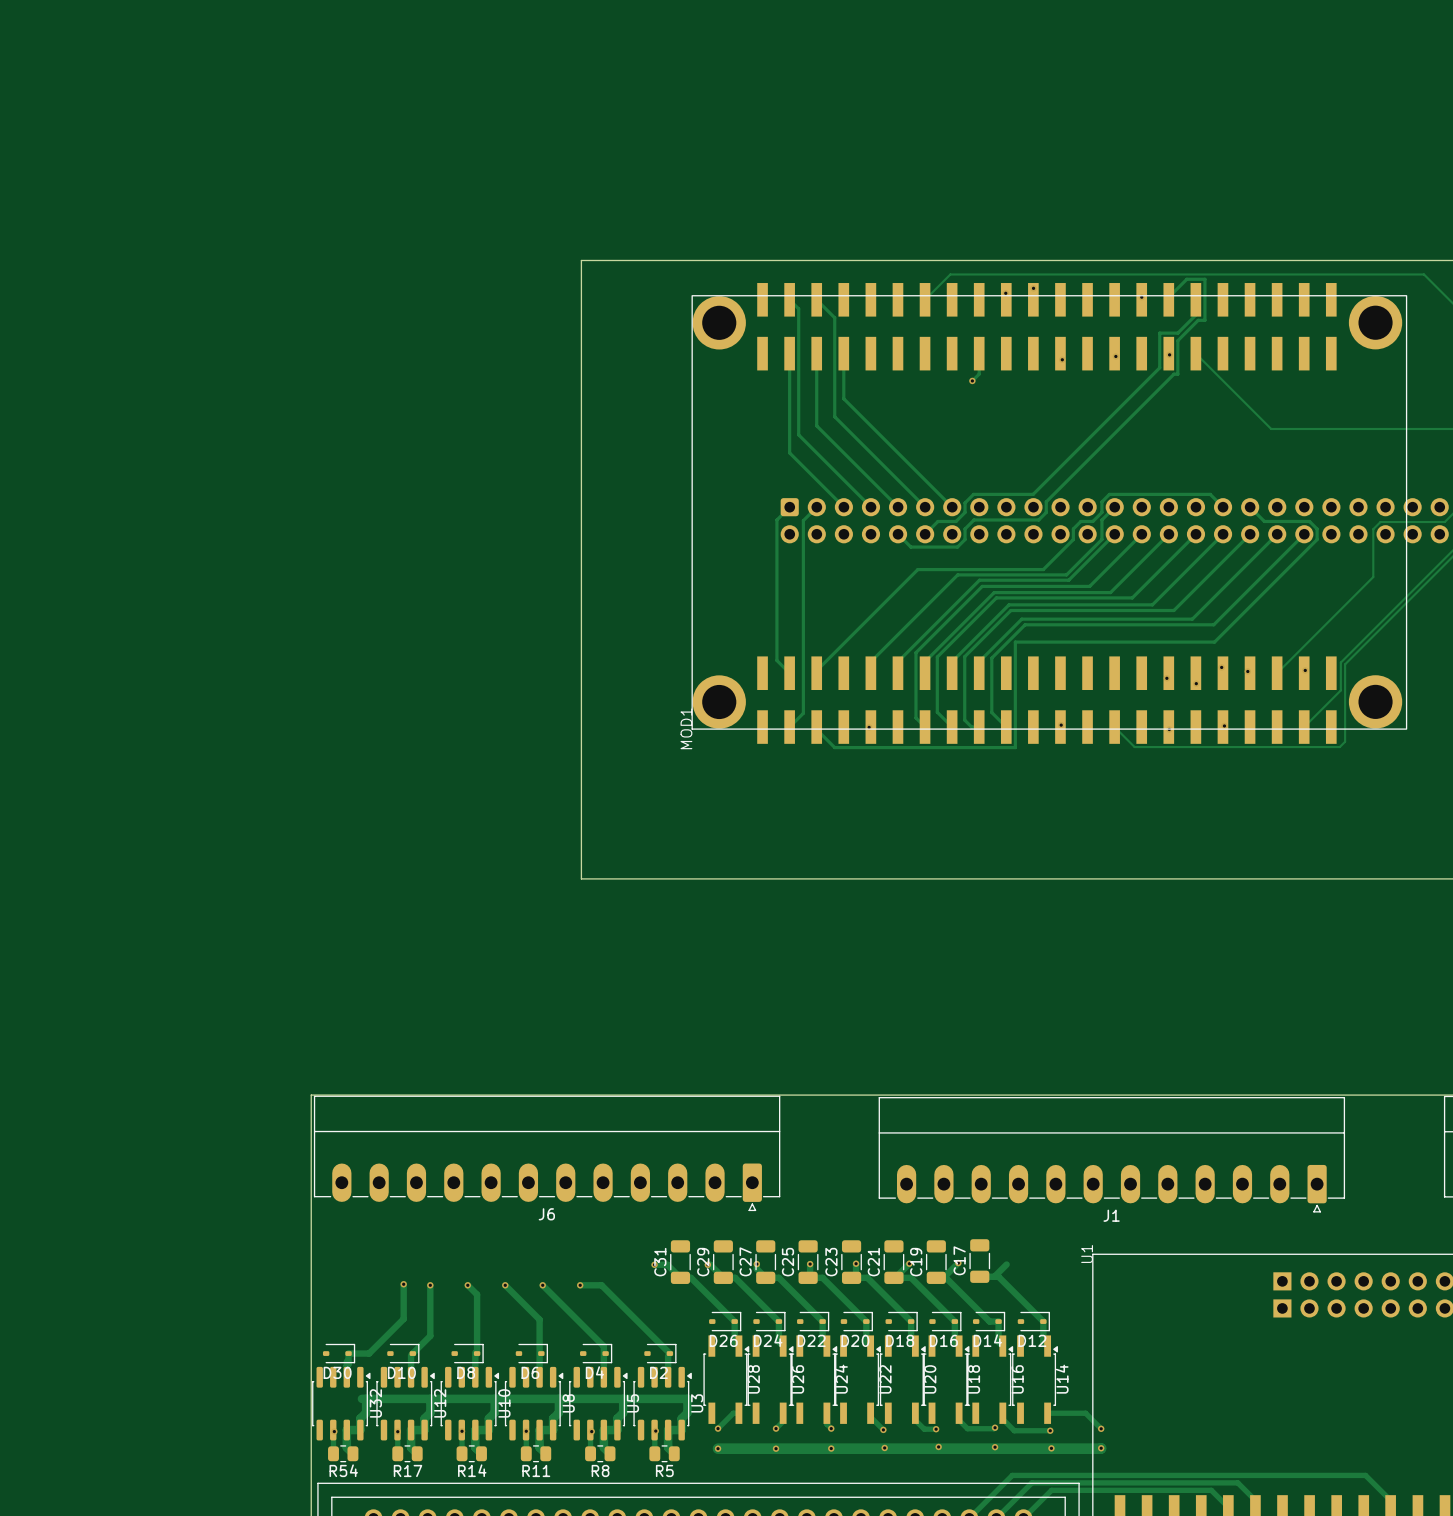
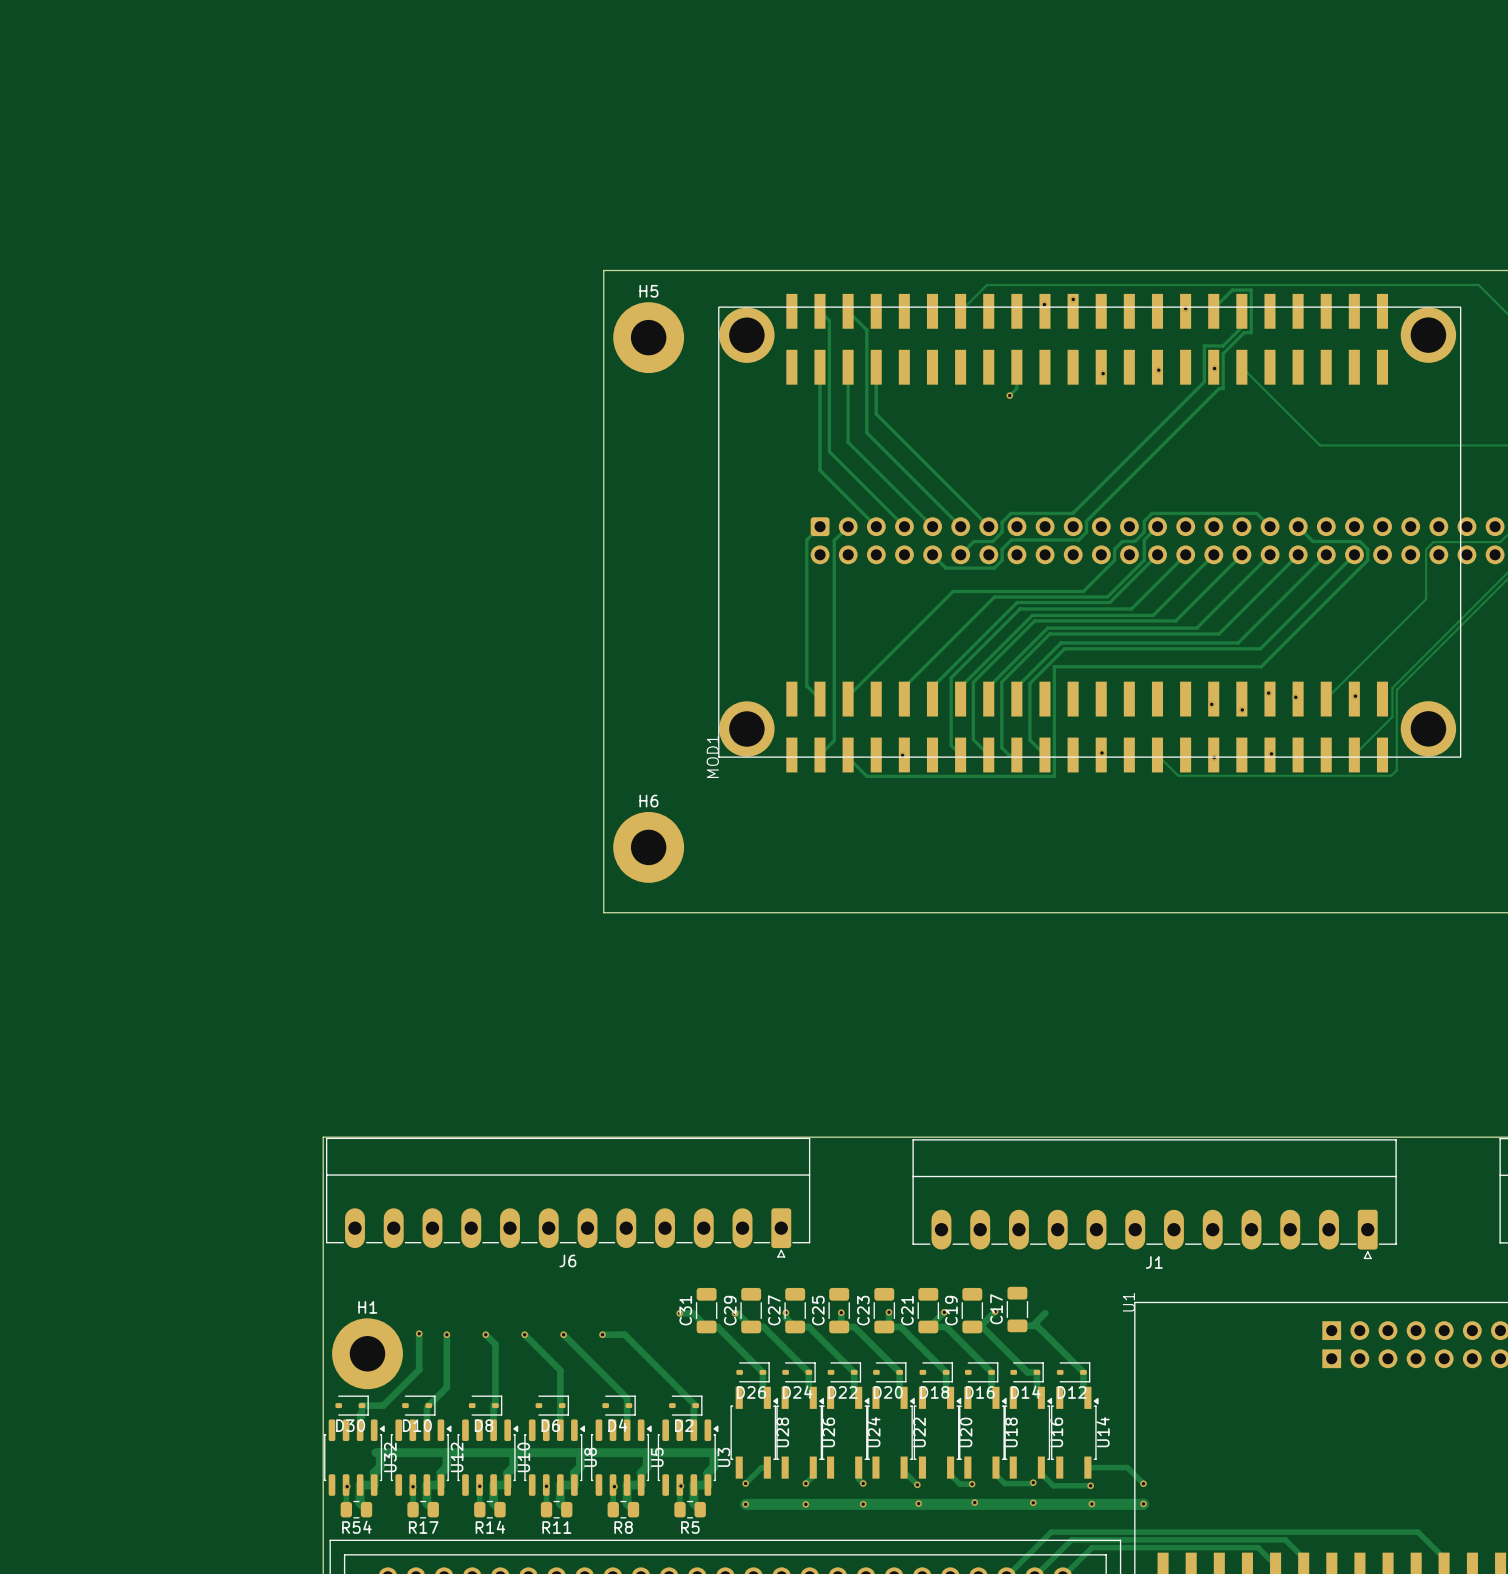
H5: none -> (648, 337)
H6: none -> (648, 847)
H1: none -> (367, 1353)

